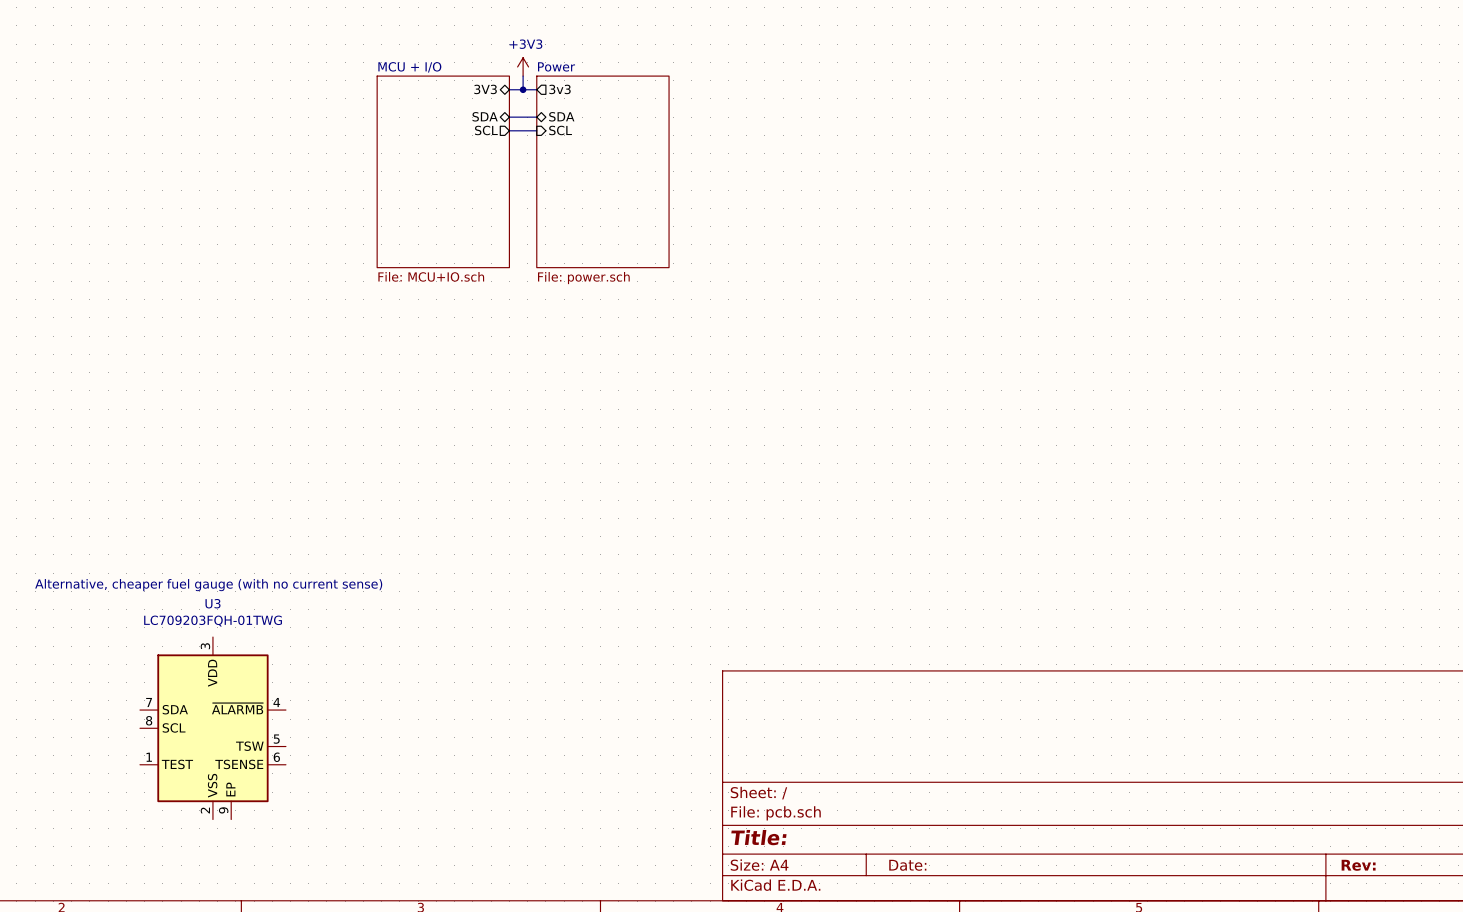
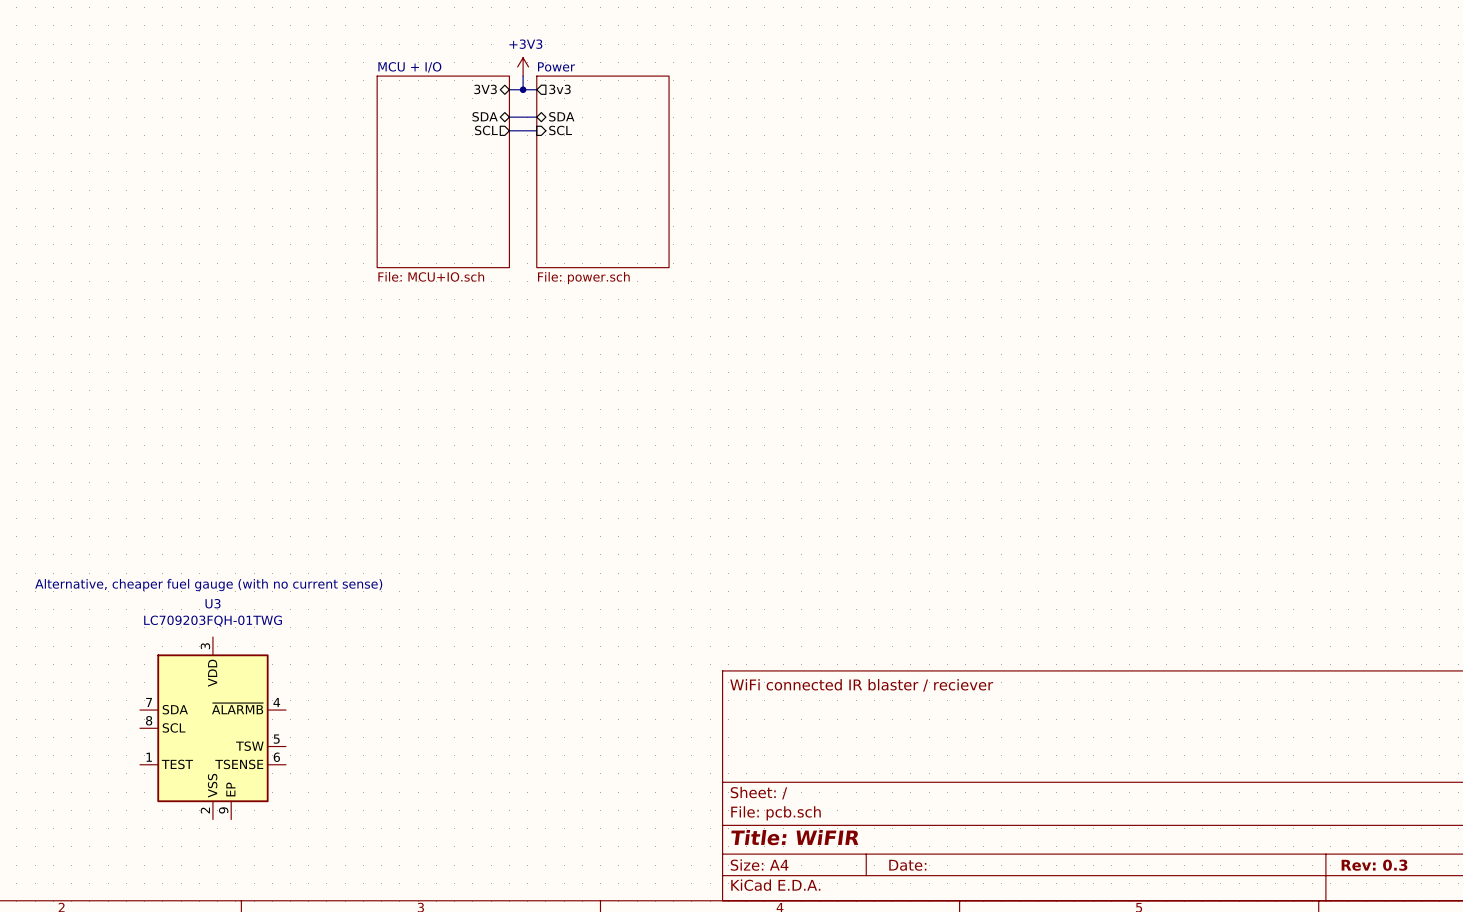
title block: none -> WiFi connected IR blaster / reciever (861, 685)
title block: Title: (758, 837) -> Title: WiFIR (794, 837)
title block: Rev: (1358, 865) -> Rev: 0.3 (1374, 865)

